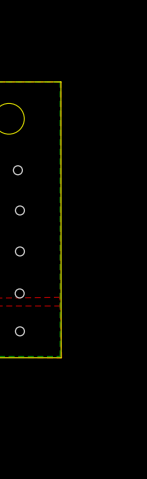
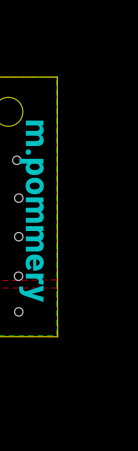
text: none -> m.pommery (31, 211)

